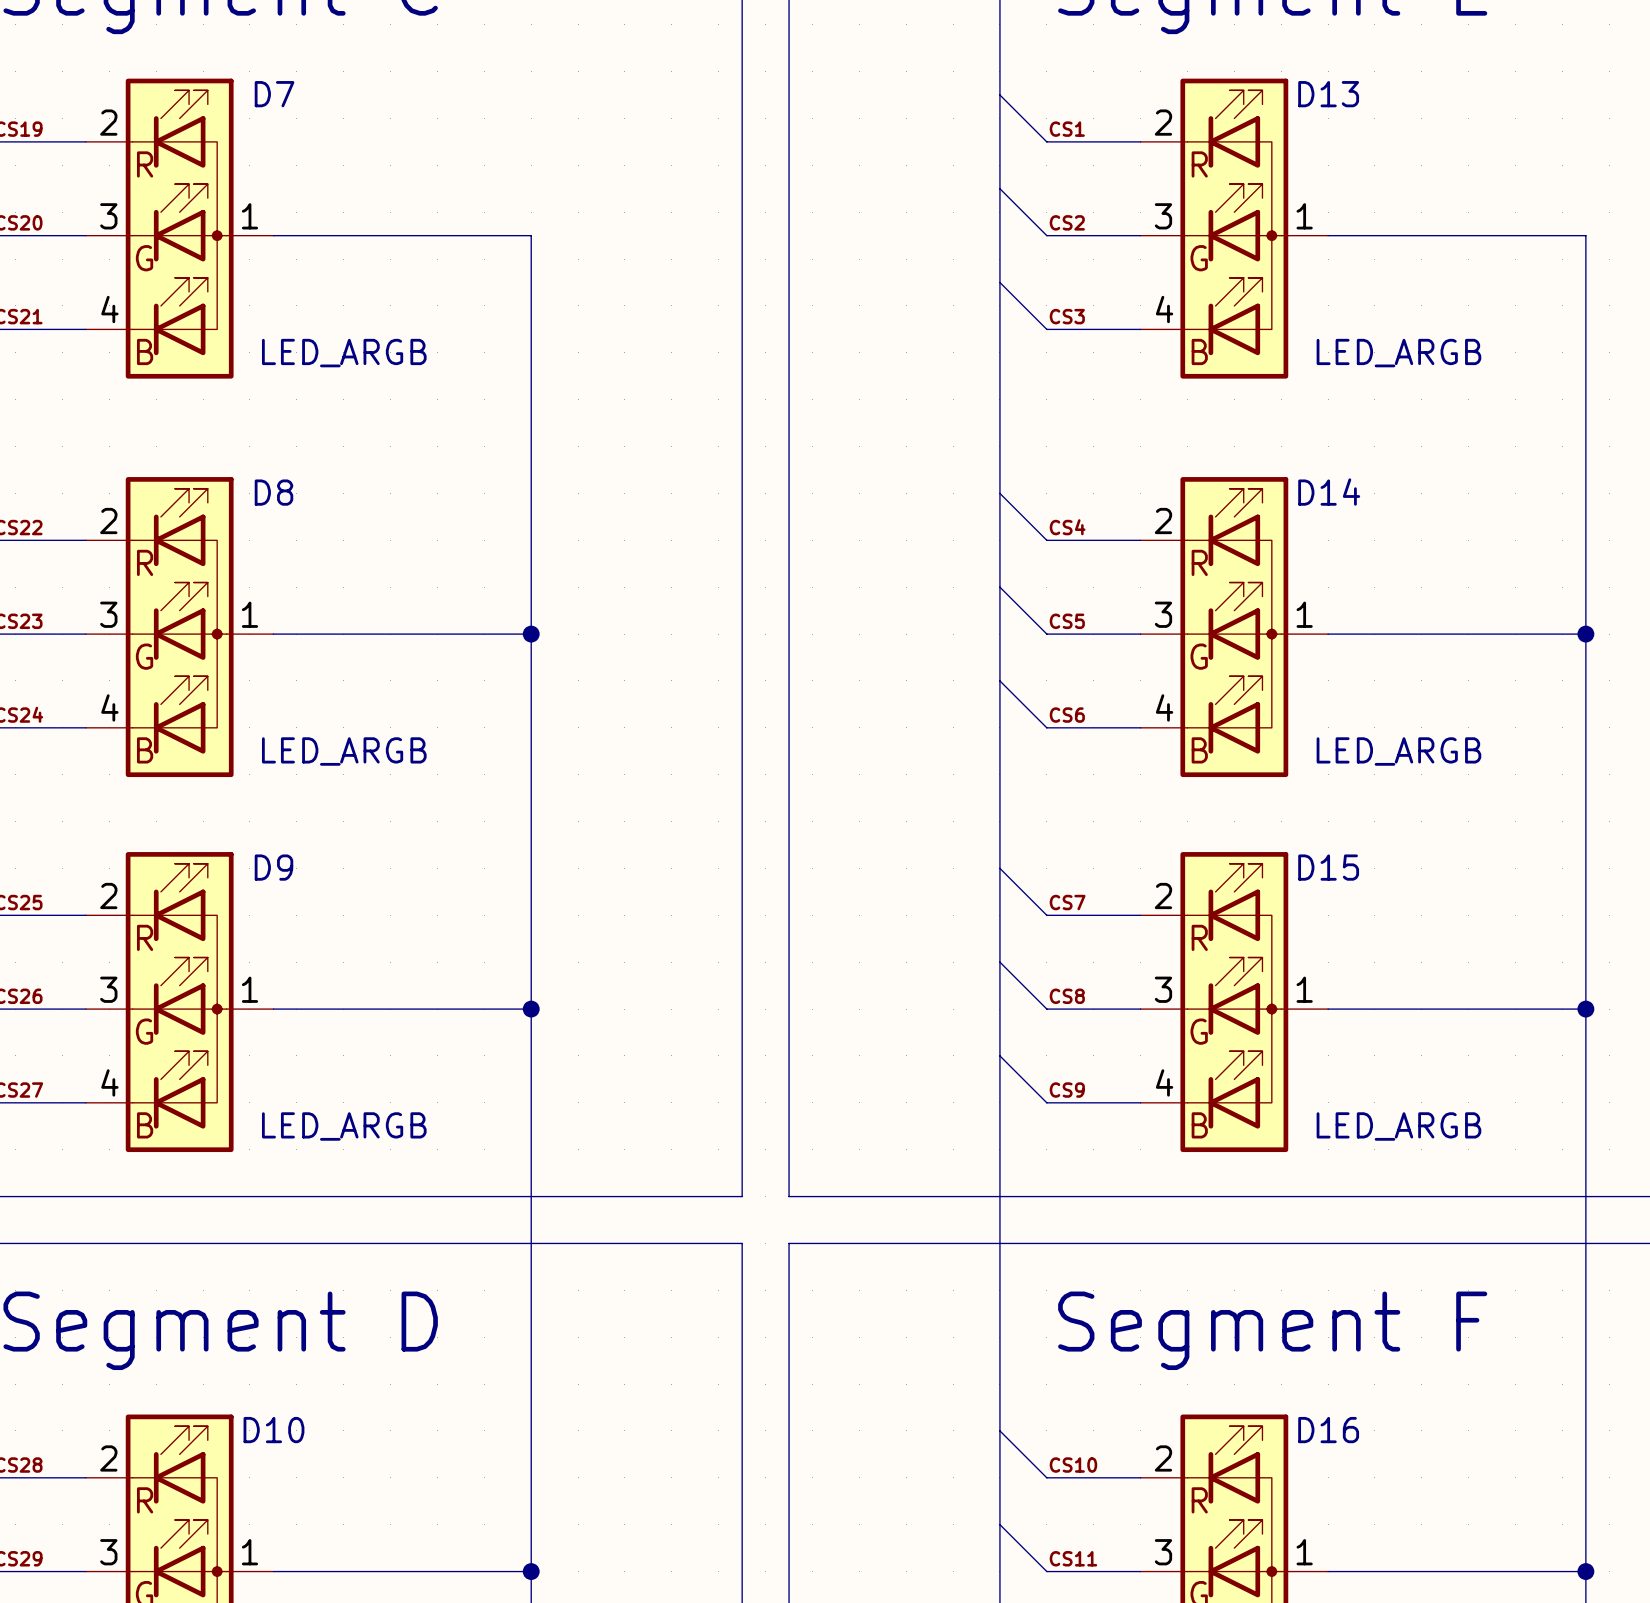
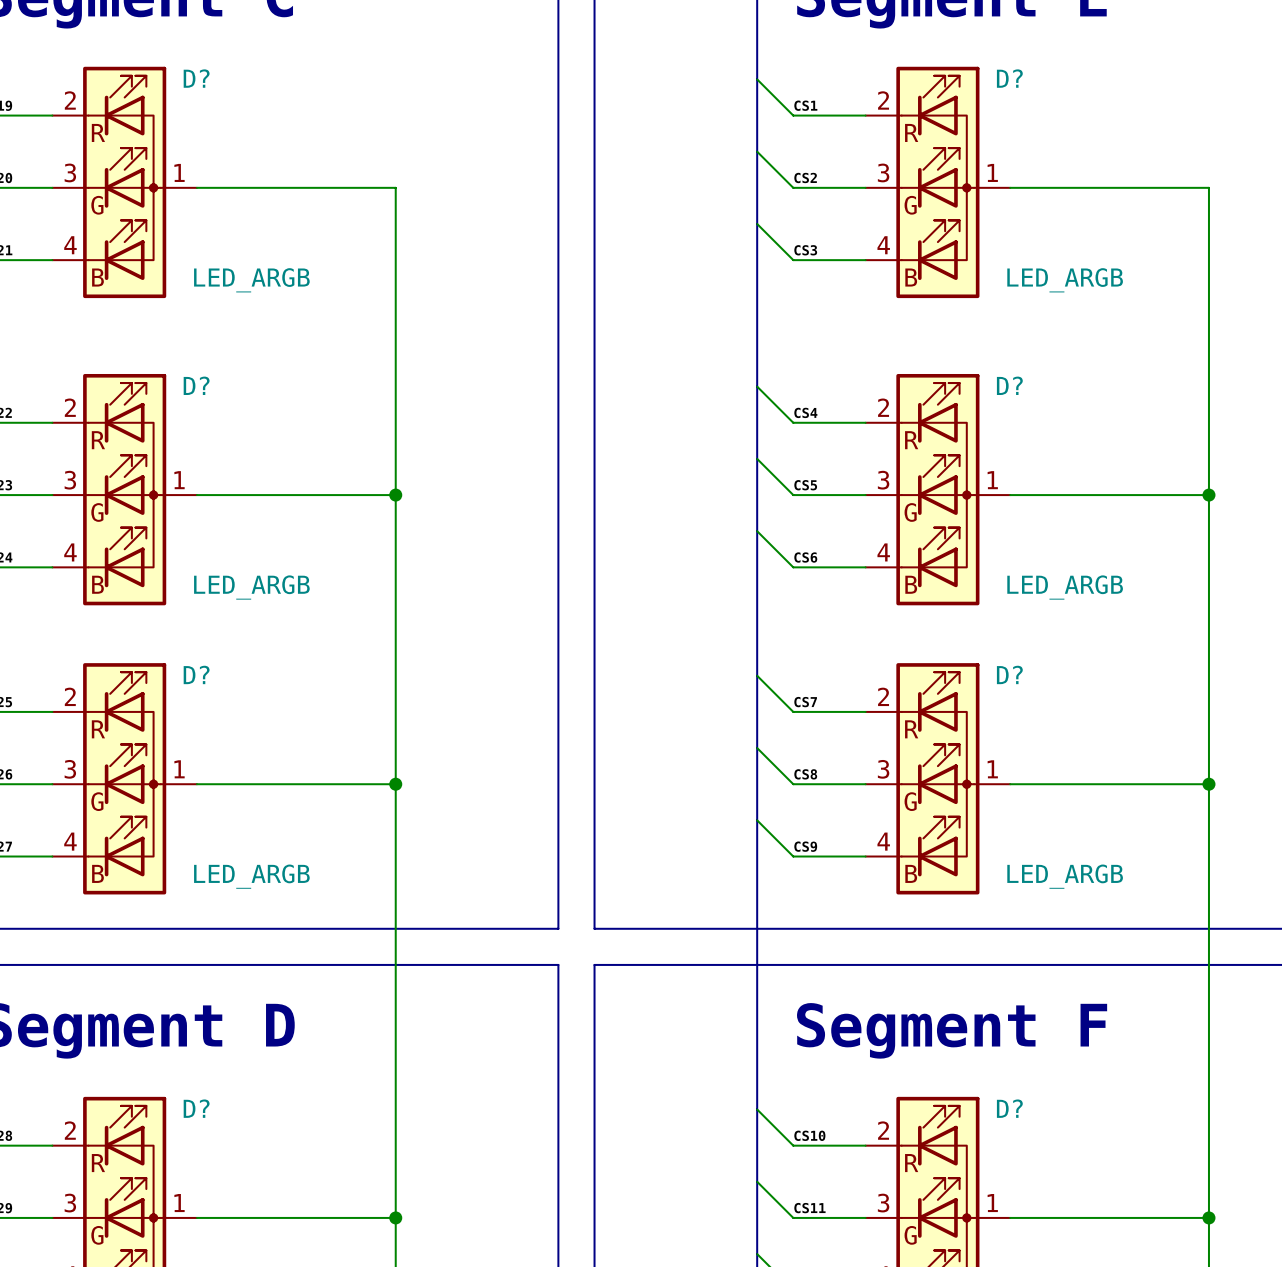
D7 name: D7 (274, 94) -> D? (196, 78)
D13 name: D13 (1328, 94) -> D? (1009, 78)
D8 name: D8 (273, 492) -> D? (196, 385)
D14 name: D14 (1329, 492) -> D? (1009, 385)
D9 name: D9 (273, 867) -> D? (196, 674)
D15 name: D15 (1328, 867) -> D? (1009, 674)
D10 name: D10 (273, 1430) -> D? (196, 1108)
D16 name: D16 (1328, 1430) -> D? (1009, 1108)

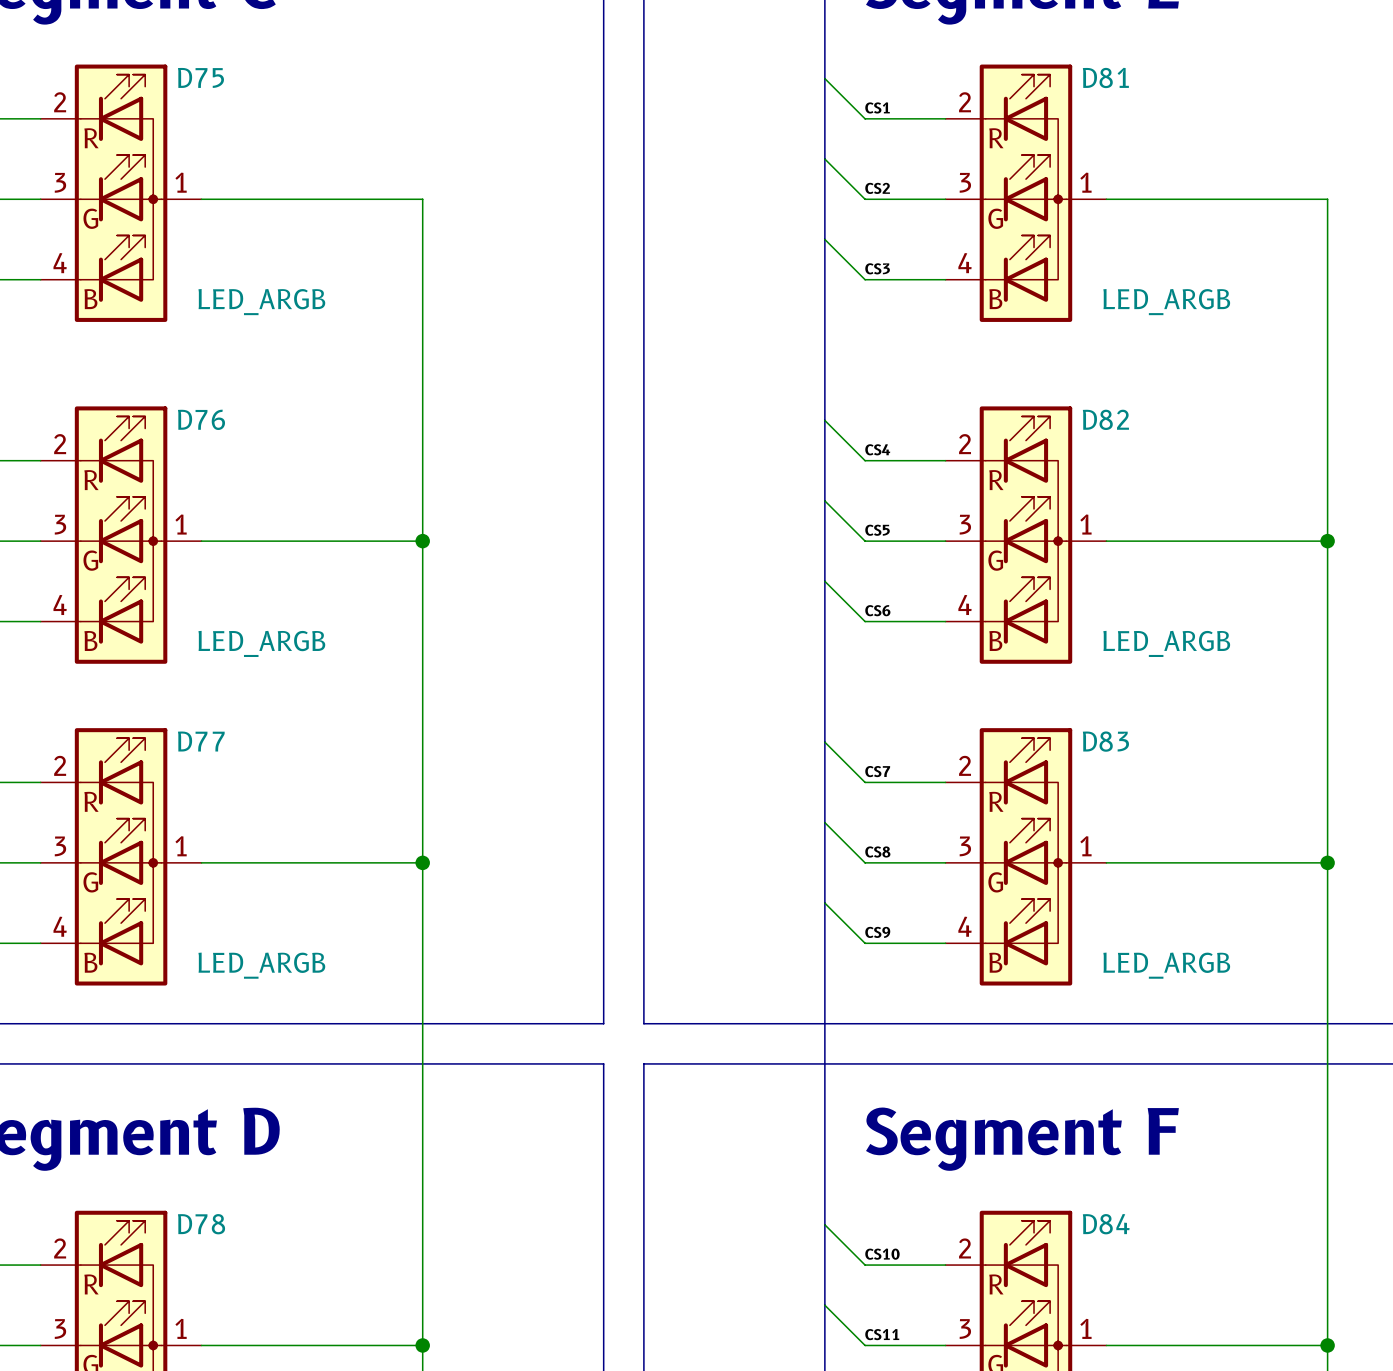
D? name: D? (196, 78) -> D75 (200, 77)
D? name: D? (1009, 78) -> D81 (1105, 77)
D? name: D? (196, 385) -> D76 (201, 419)
D? name: D? (1009, 385) -> D82 (1105, 419)
D? name: D? (196, 674) -> D77 (201, 741)
D? name: D? (1009, 674) -> D83 (1105, 741)
D? name: D? (196, 1108) -> D78 (201, 1224)
D? name: D? (1009, 1108) -> D84 (1106, 1224)

